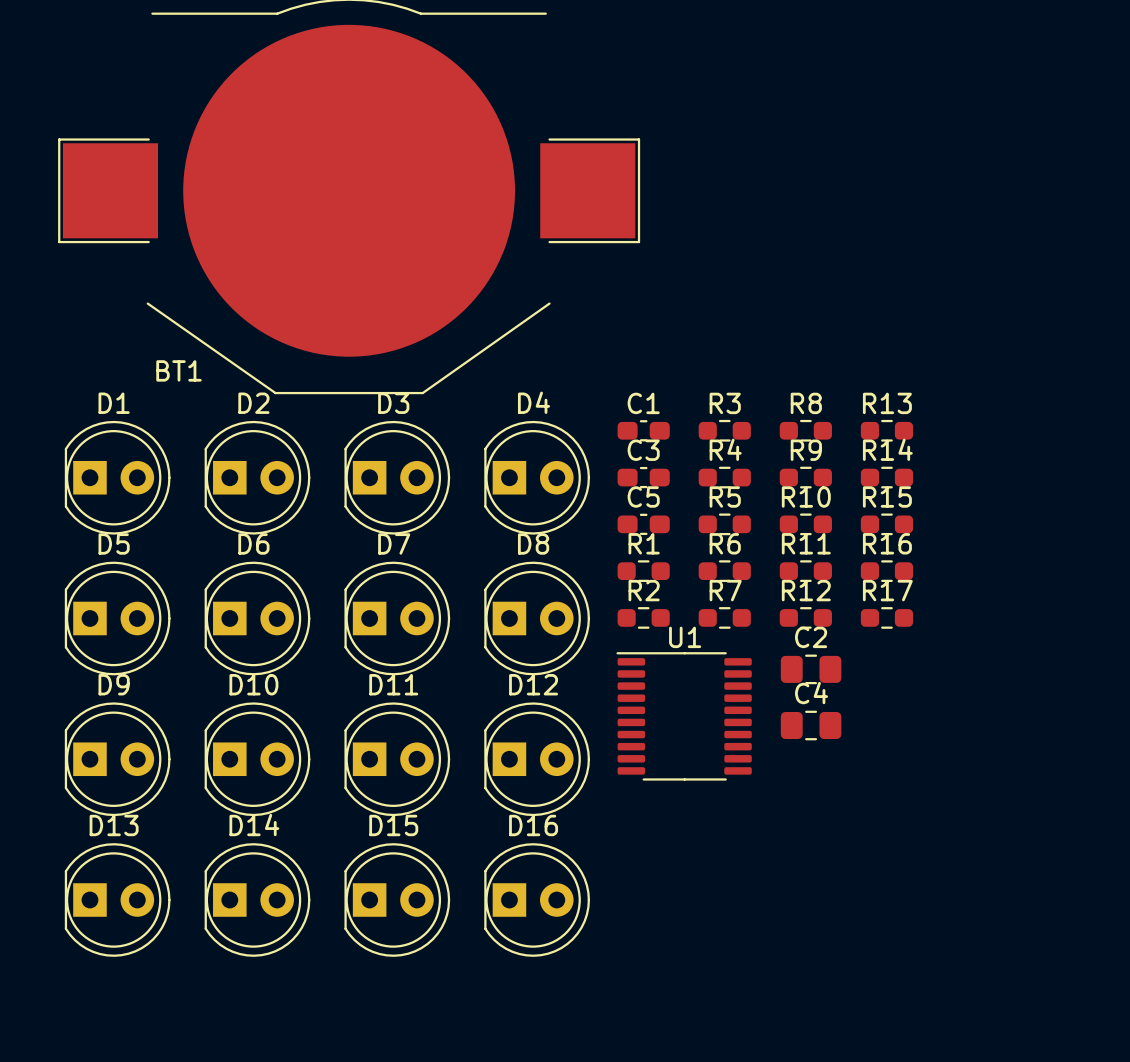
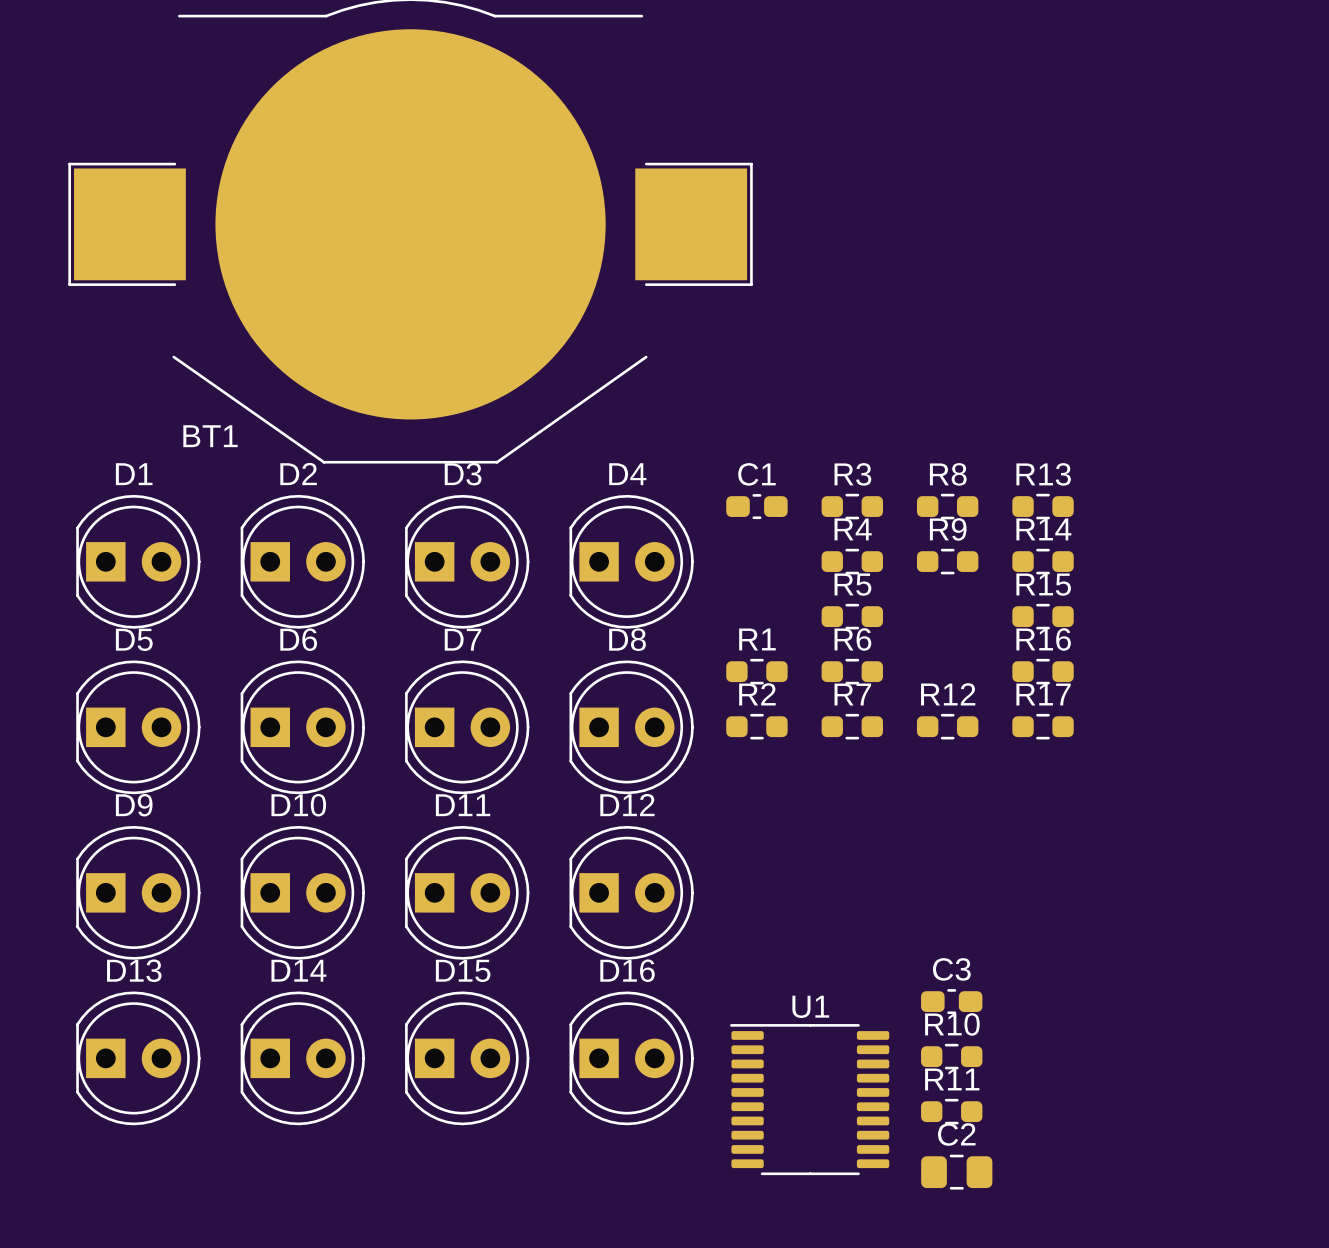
C3 position: (643, 477) -> (951, 1001)
C5: (643, 524) -> none
R10 position: (805, 524) -> (951, 1056)
R11 position: (805, 571) -> (951, 1111)
C2 position: (811, 669) -> (956, 1172)
U1 position: (684, 716) -> (809, 1099)
C4: (811, 725) -> none

